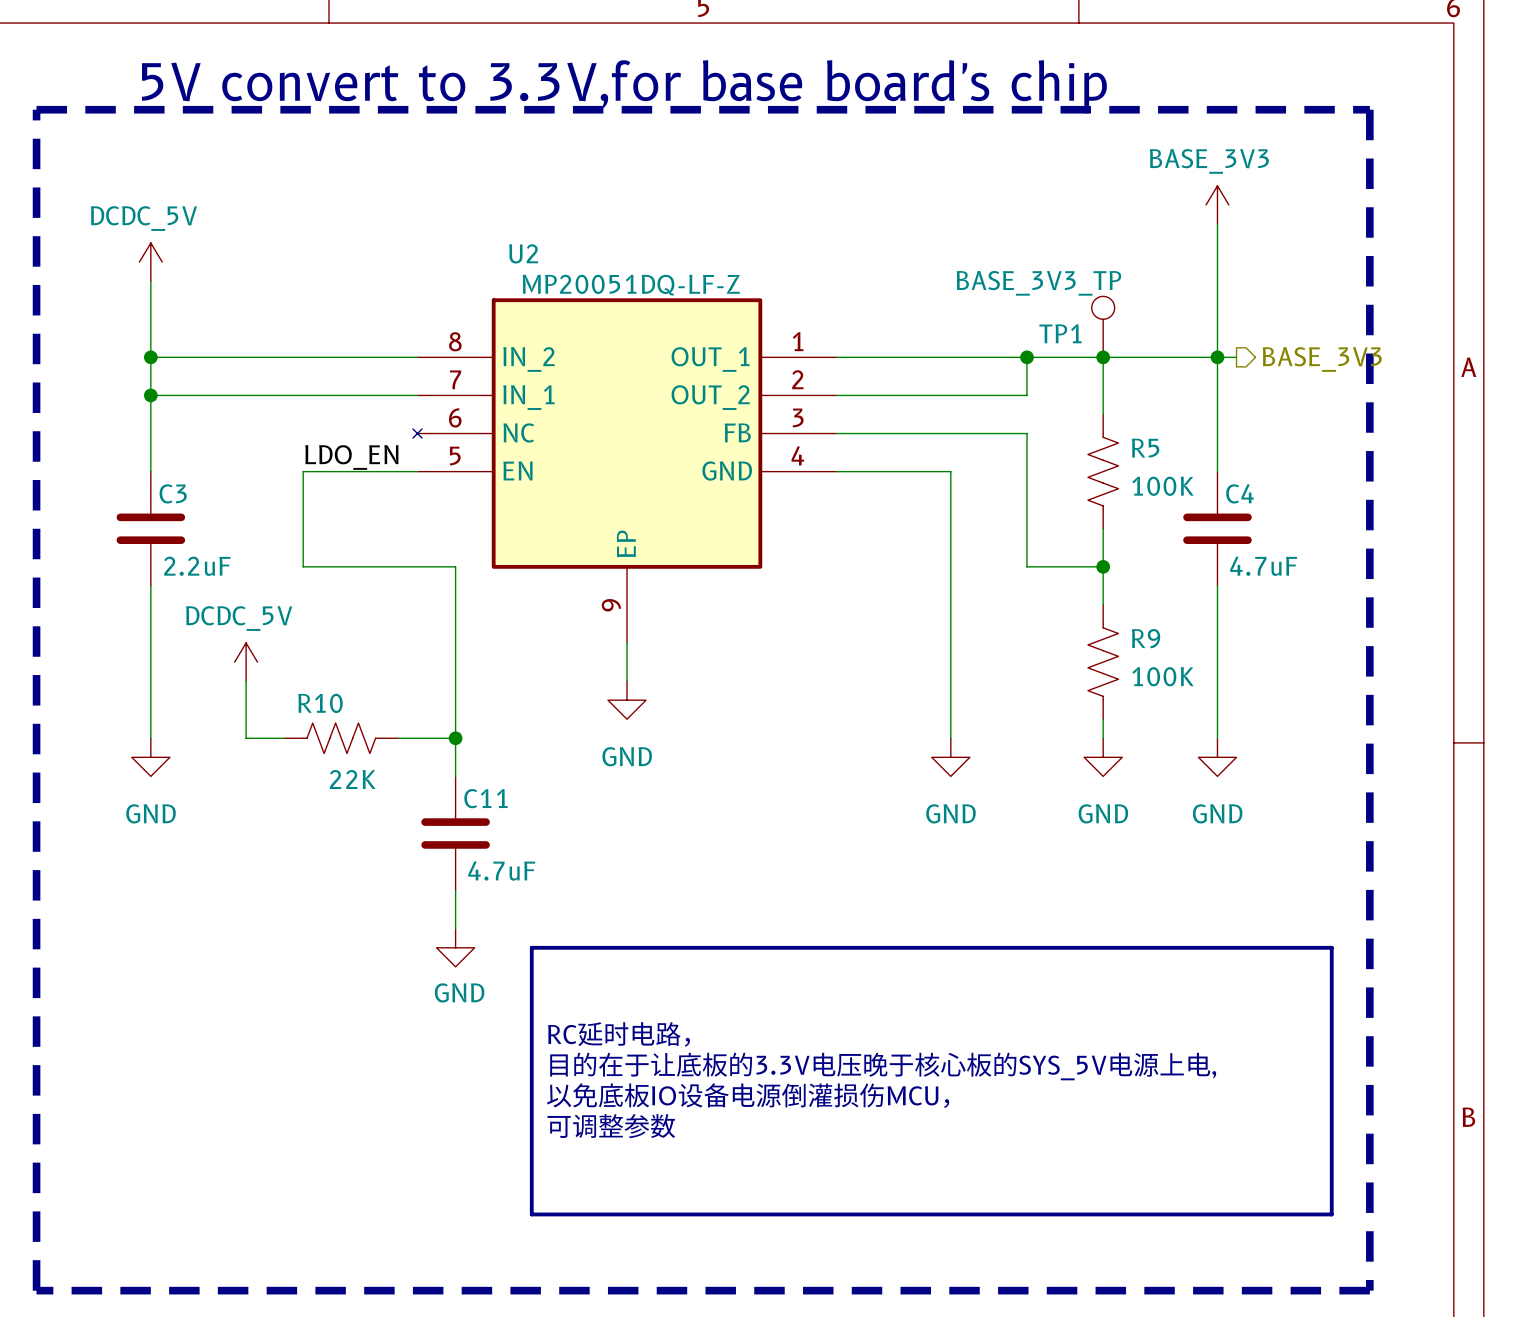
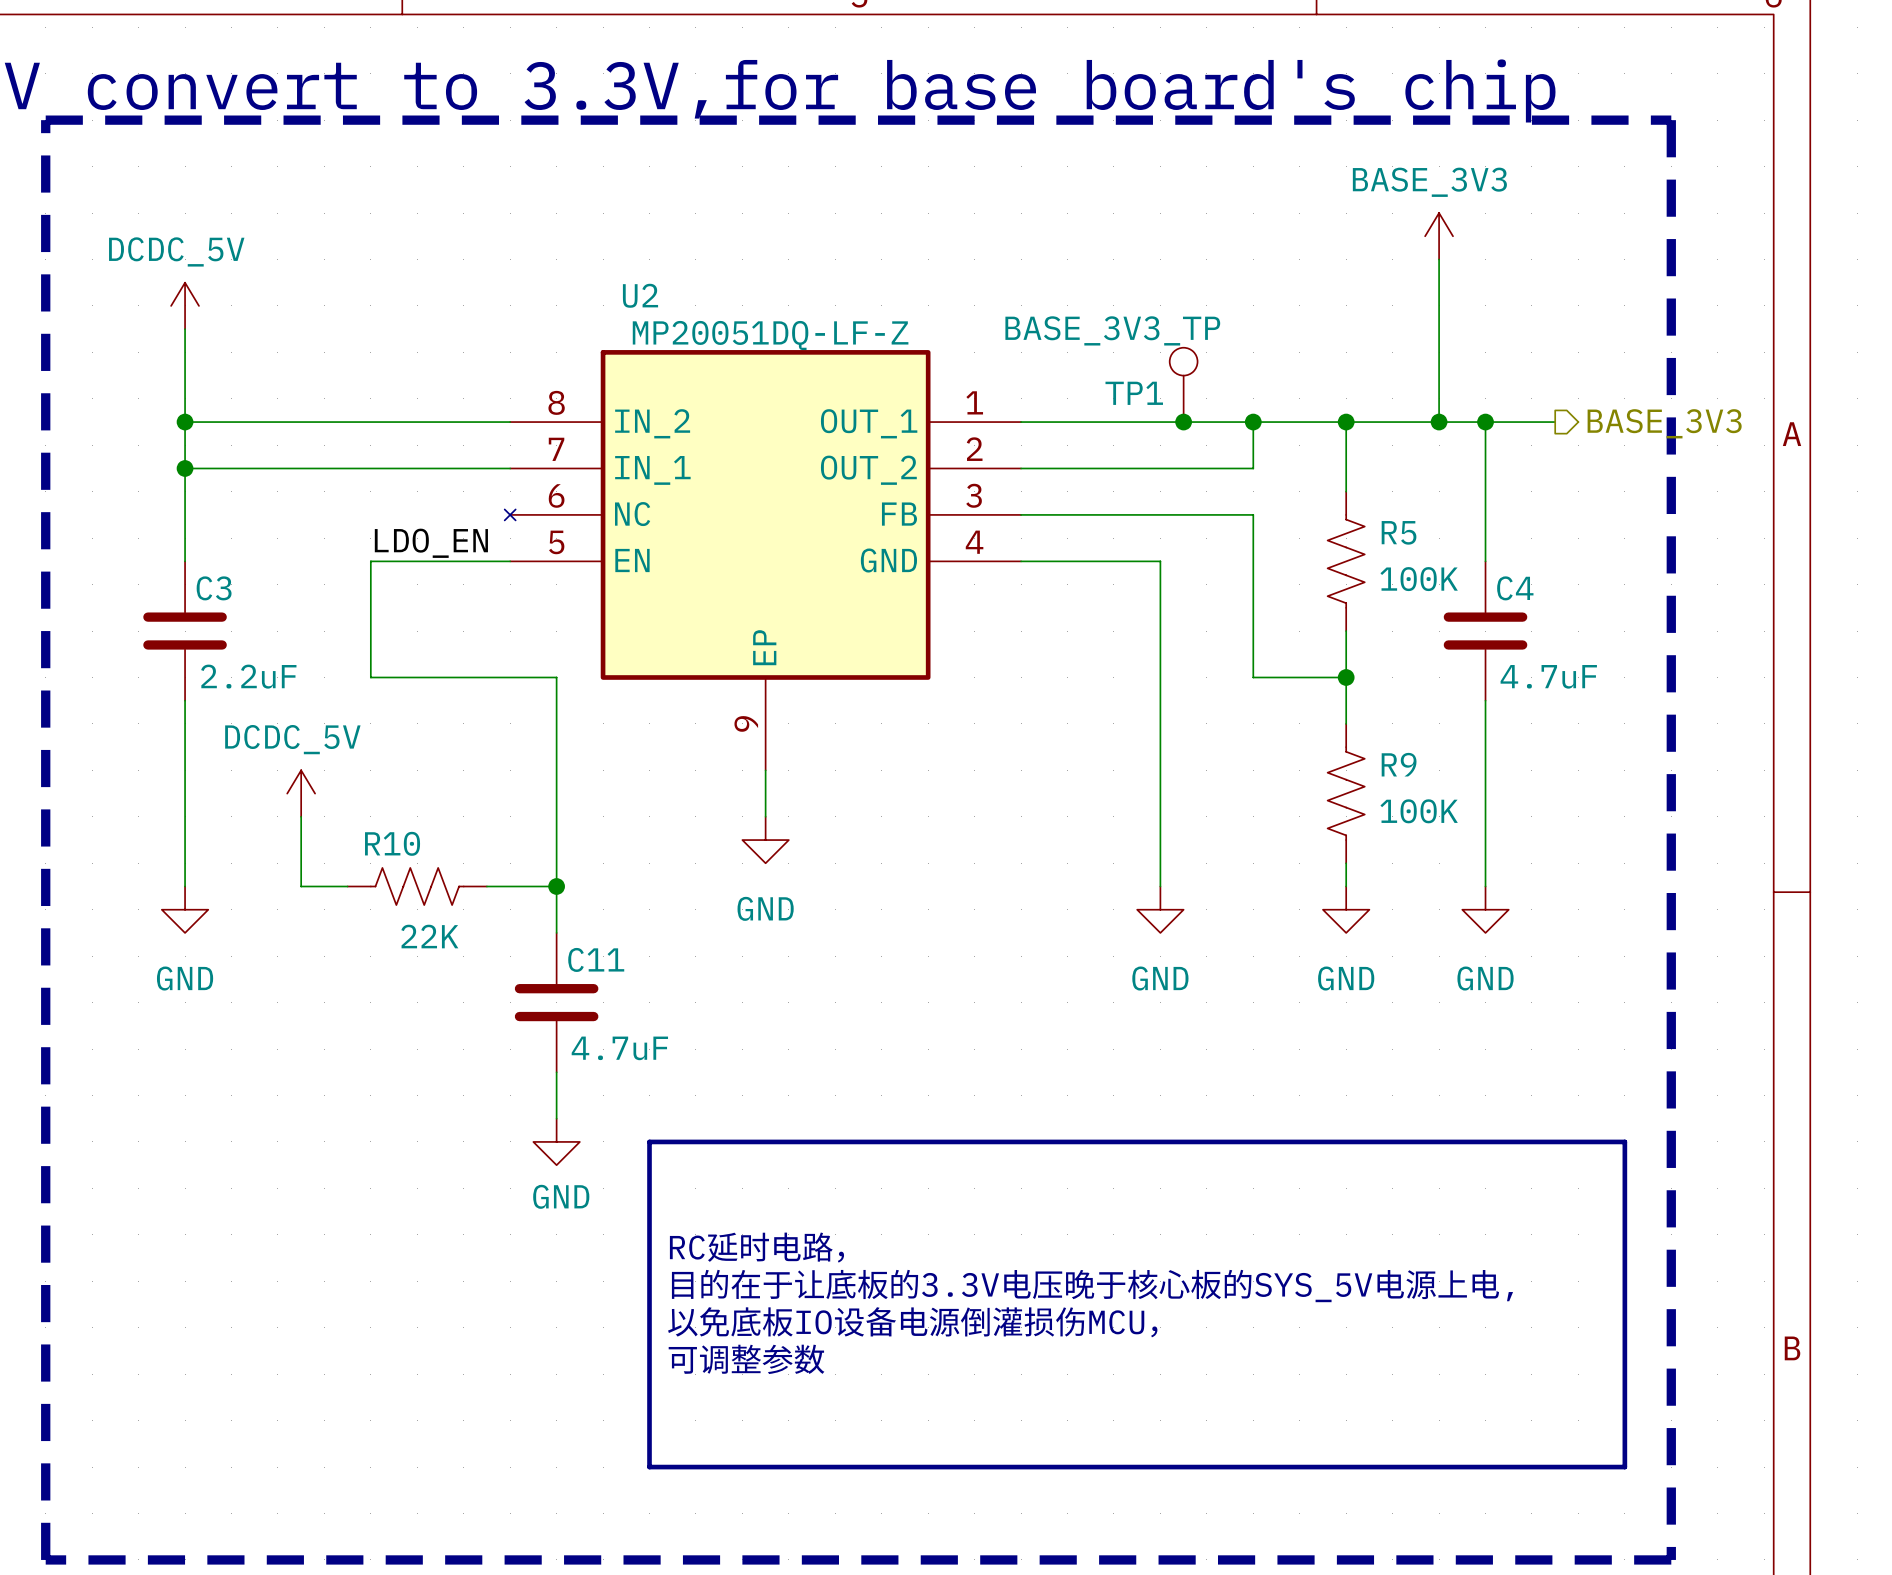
power symbol position: BASE_3V3 (1217, 204) -> BASE_3V3 (1439, 236)
wire: (1217, 224) (1217, 357) -> (1439, 259) (1439, 422)
TP1 position: (1103, 326) -> (1183, 384)
junction: none -> (1183, 422)
junction: none -> (1439, 422)
wire: none -> (1508, 422) (1555, 422)
hierarchical label position: BASE_3V3 (1322, 359) -> BASE_3V3 (1664, 423)

